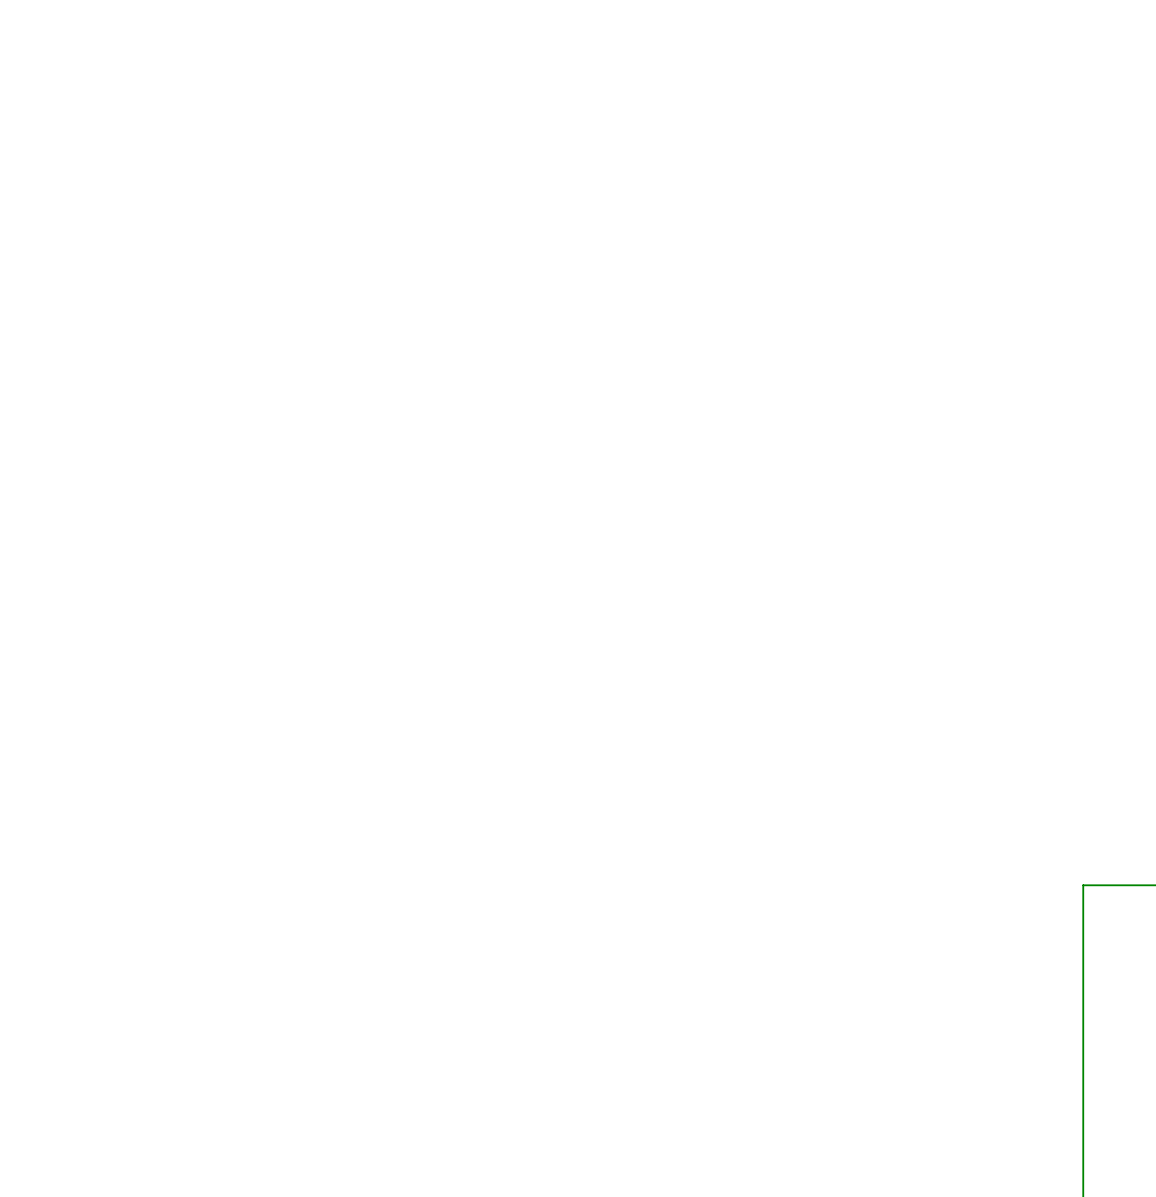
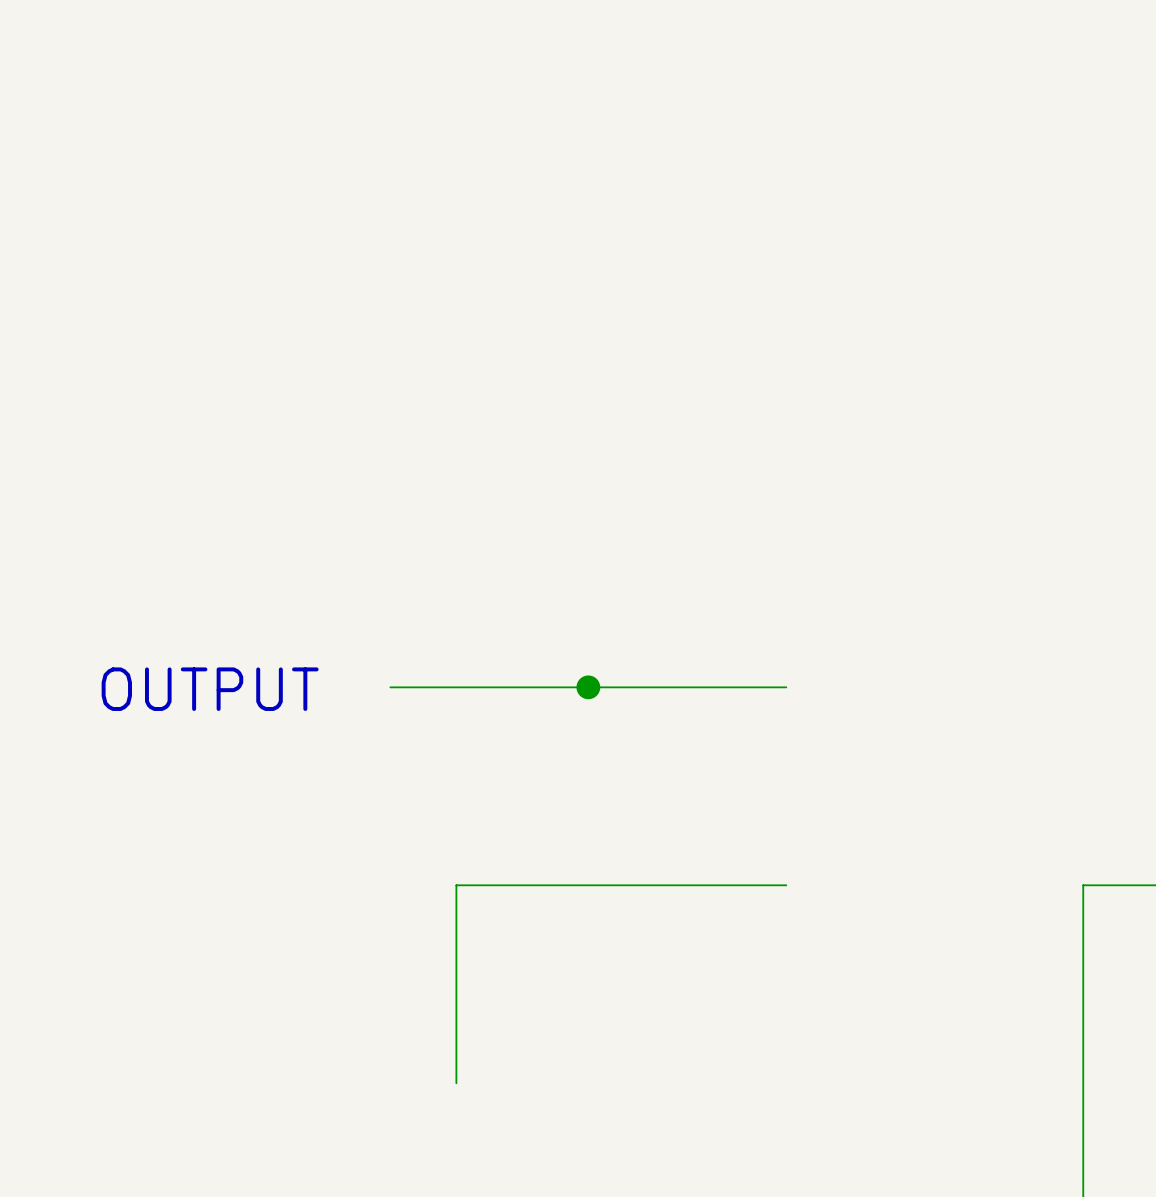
wire: none -> (390, 687) (786, 687)
junction: none -> (588, 687)
text: none -> OUTPUT (210, 689)
wire: none -> (786, 885) (456, 885) (456, 1083)

